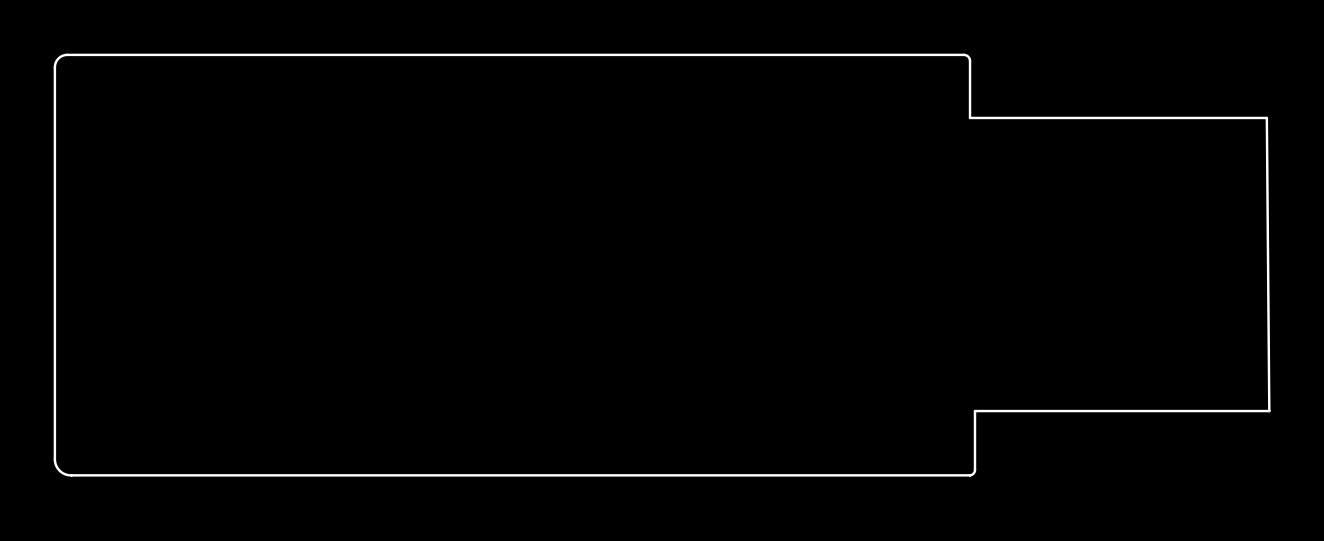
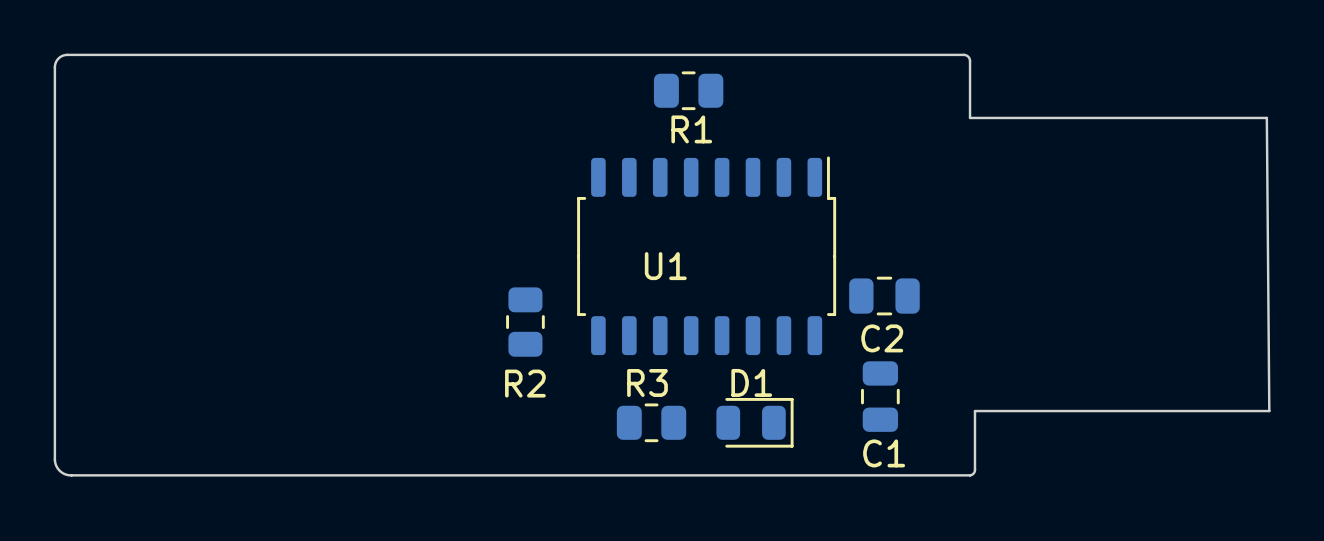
R1: none -> (688, 90)
U1: none -> (706, 255)
C2: none -> (884, 296)
R2: none -> (525, 322)
C1: none -> (880, 396)
R3: none -> (651, 422)
D1: none -> (754, 422)

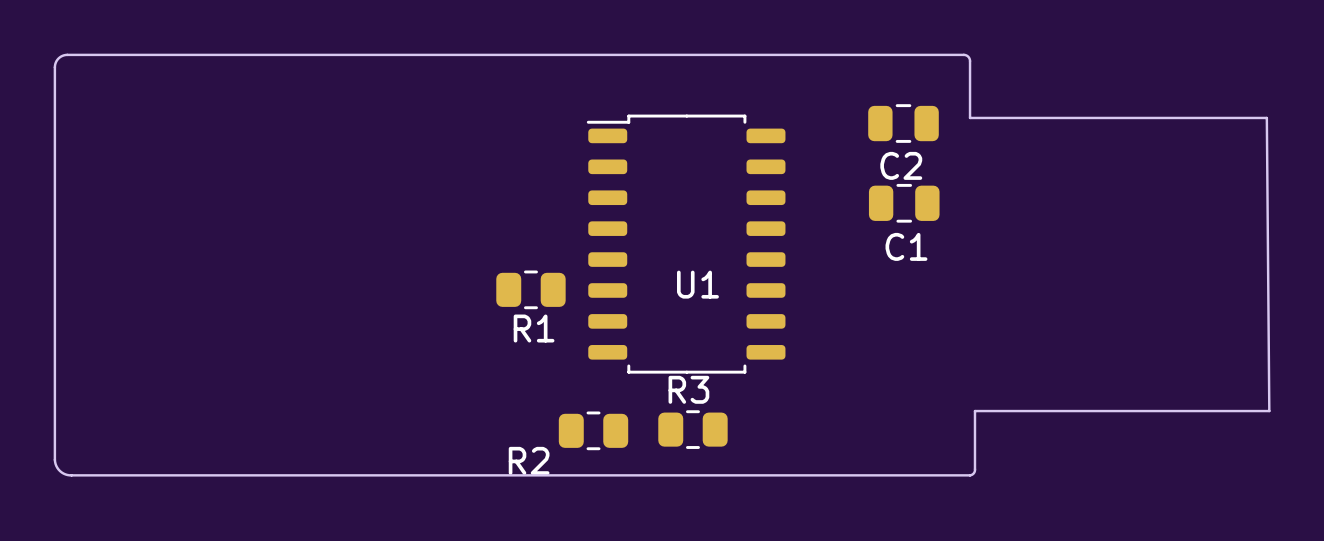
R1 position: (688, 90) -> (530, 289)
U1 rotation: 0° (706, 255) -> 90° counterclockwise (686, 244)
C2 position: (884, 296) -> (903, 123)
R2 rotation: 0° (525, 322) -> 90° clockwise (593, 430)
R2 position: (525, 322) -> (593, 430)
C1 rotation: 0° (880, 396) -> 90° clockwise (904, 203)
C1 position: (880, 396) -> (904, 203)
R3 position: (651, 422) -> (692, 429)
D1: (754, 422) -> none

